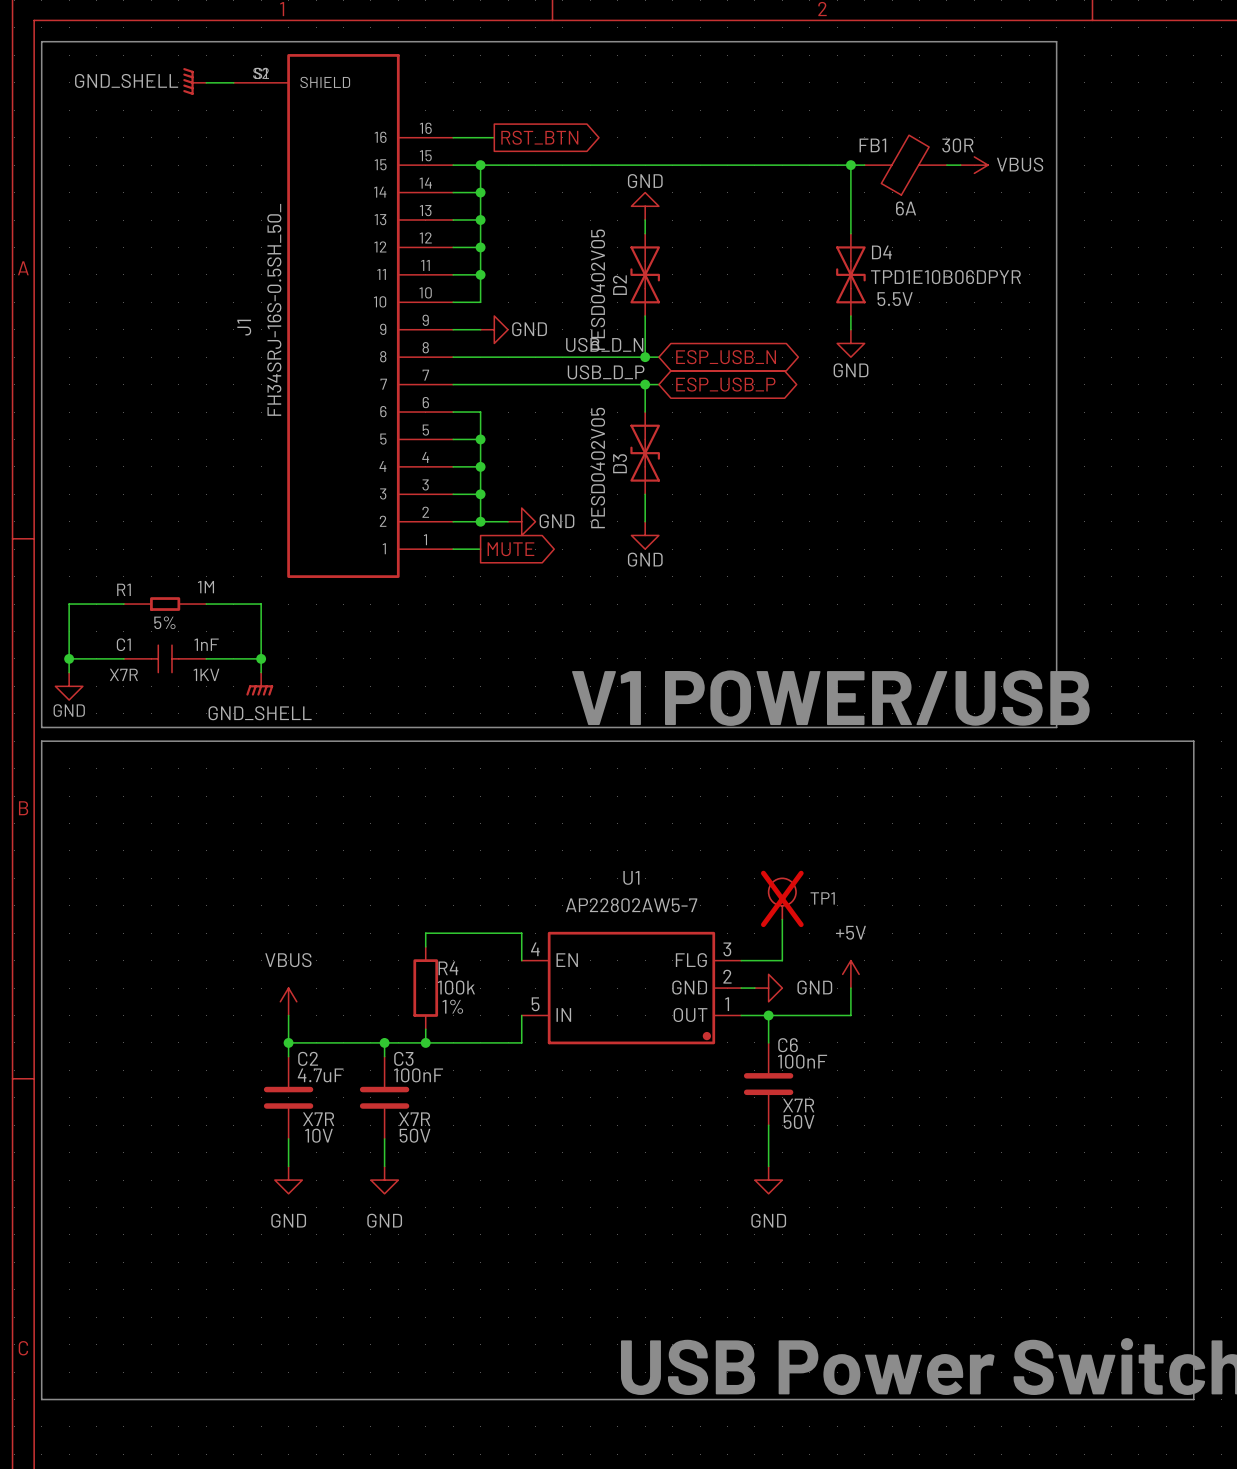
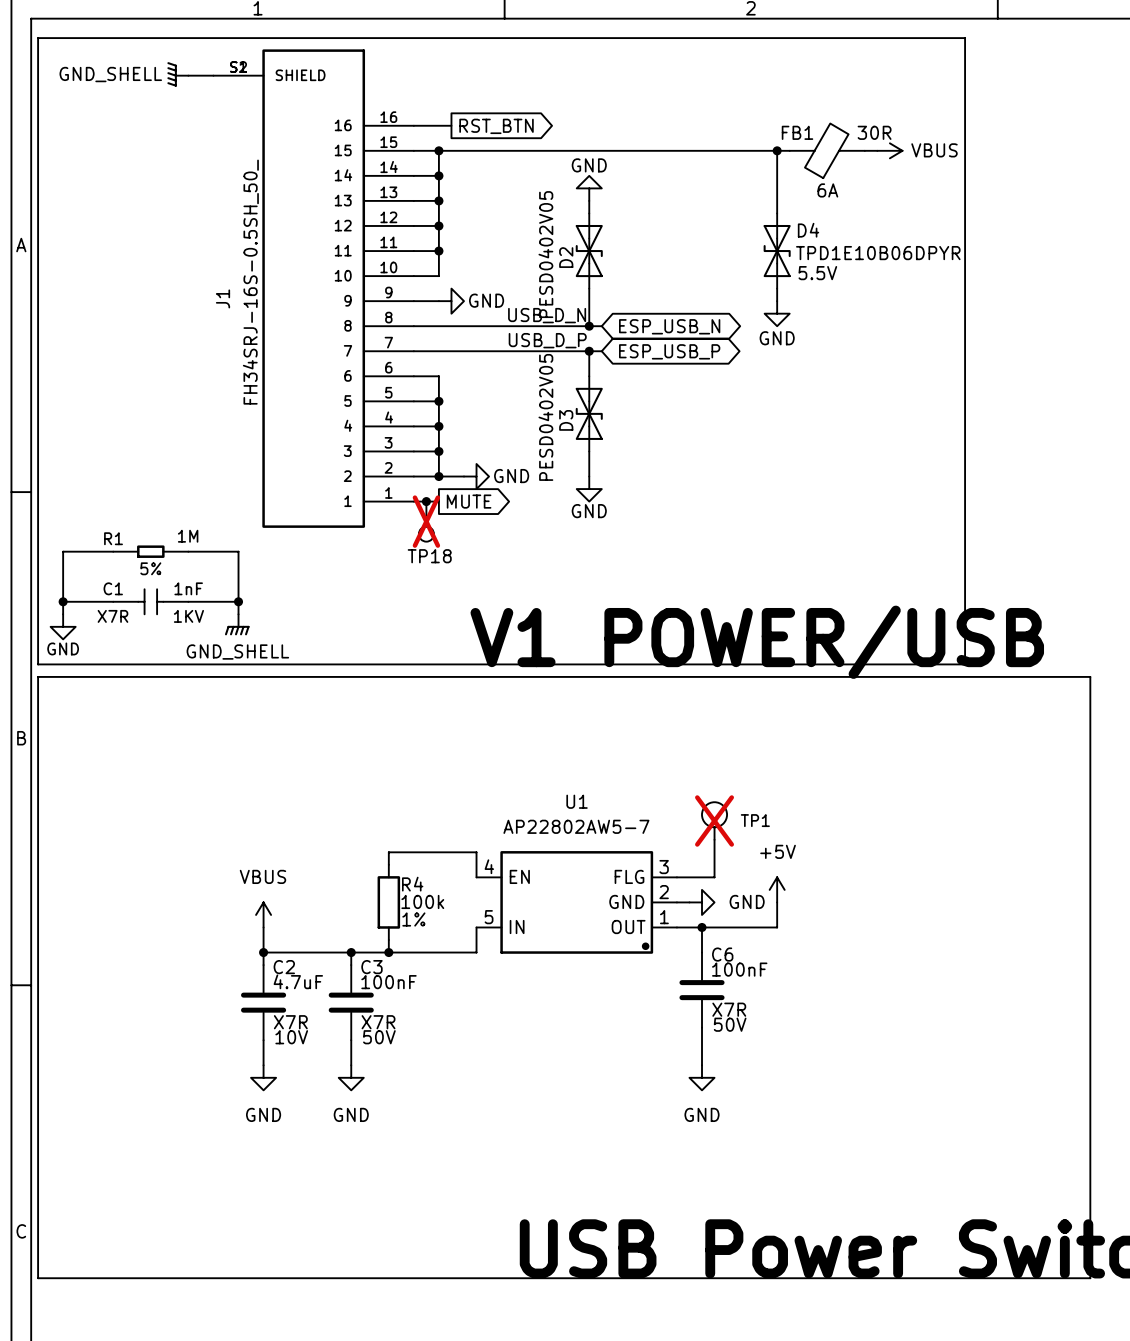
junction: none -> (426, 501)
TP18: none -> (426, 521)

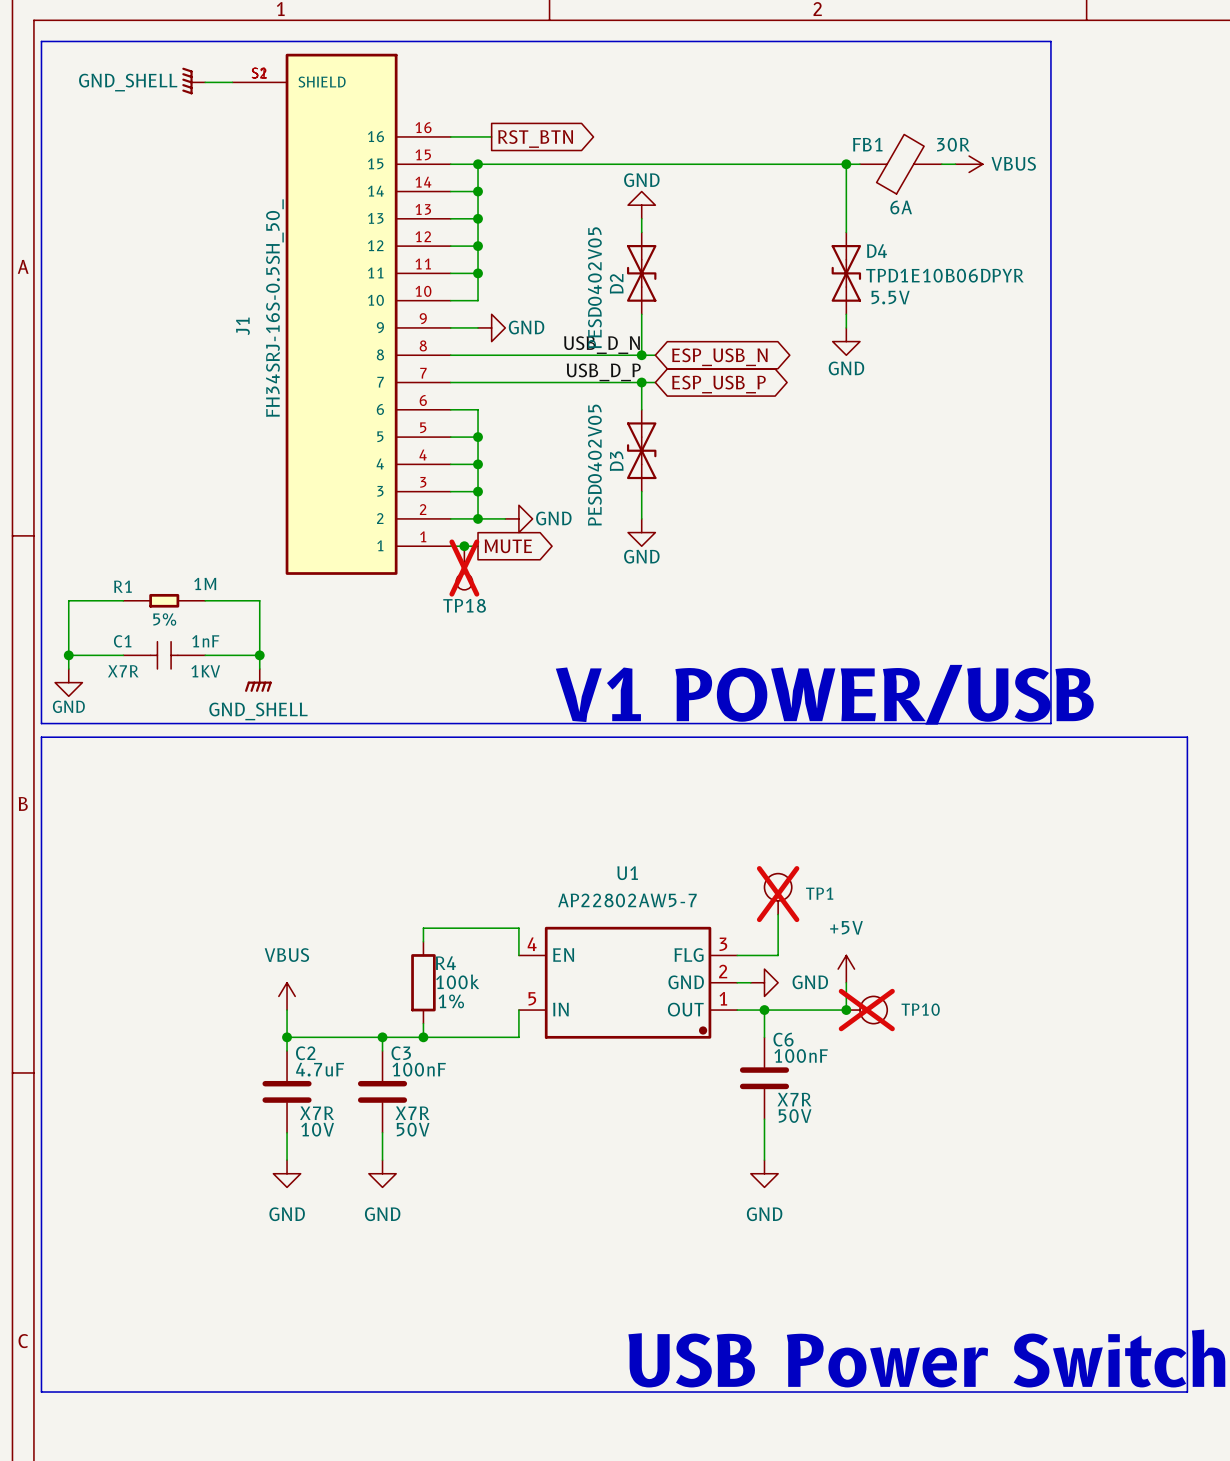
junction: none -> (846, 1010)
TP10: none -> (866, 1010)

